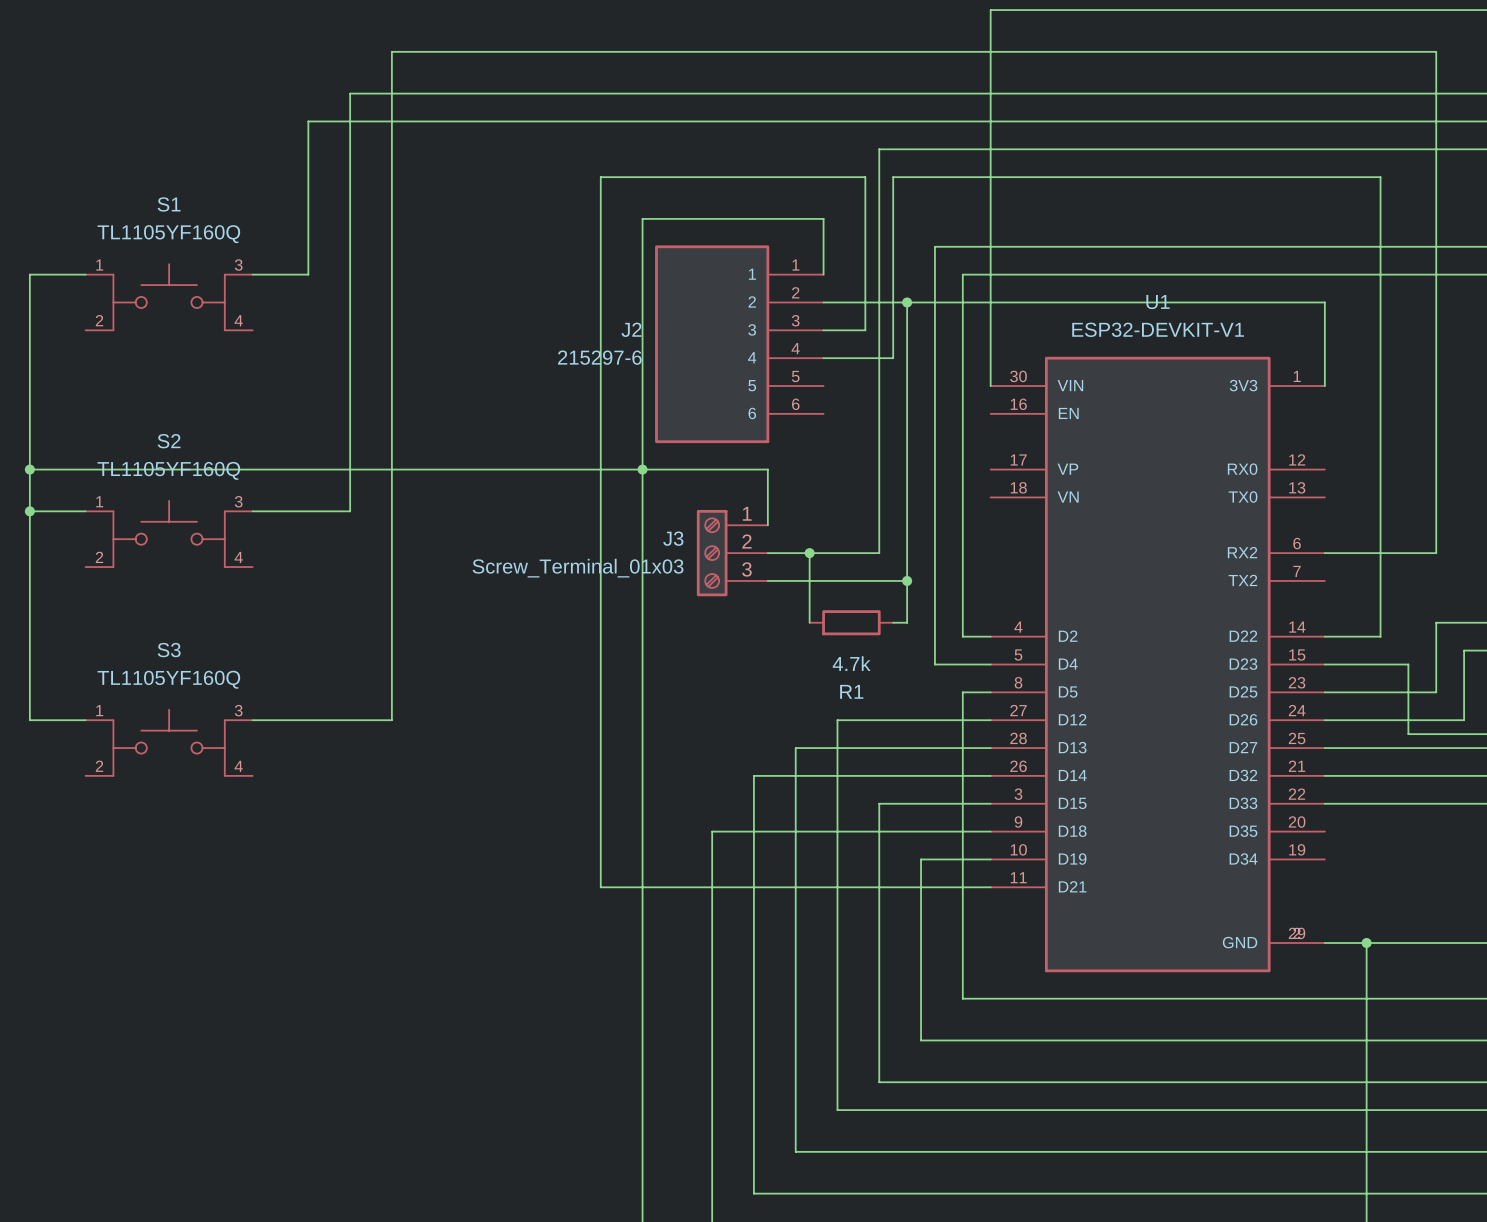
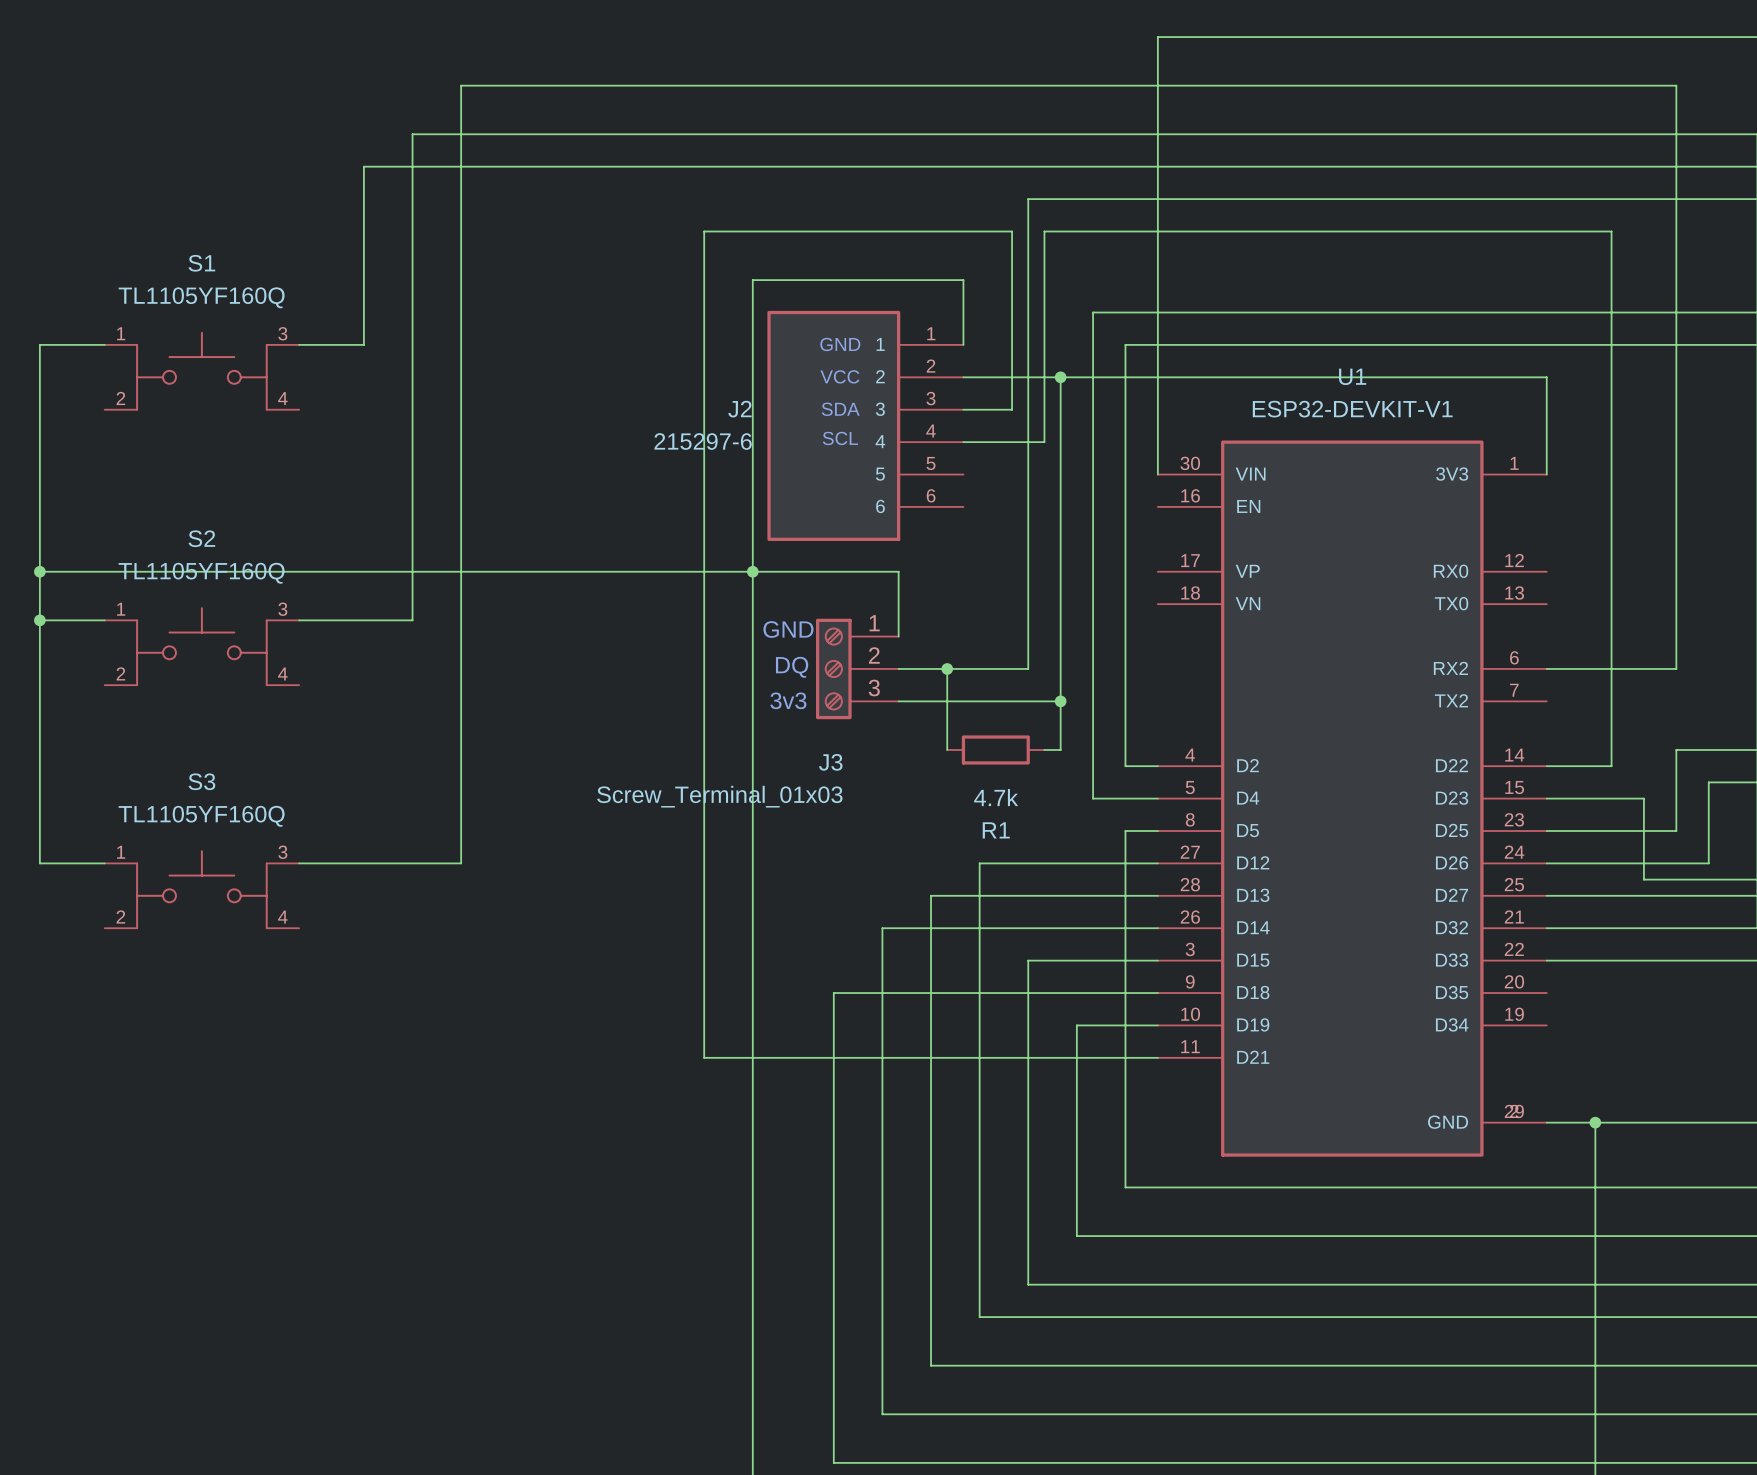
text: none -> GND (840, 344)
text: none -> VCC (839, 376)
text: none -> SDA (840, 409)
text: none -> SCL (840, 438)
text: none -> GND (788, 629)
J3 name position: J3 (673, 538) -> J3 (830, 762)
text: none -> DQ (792, 667)
J3 value position: Screw_Terminal_01x03 (578, 568) -> Screw_Terminal_01x03 (719, 796)
text: none -> 3v3 (788, 700)

